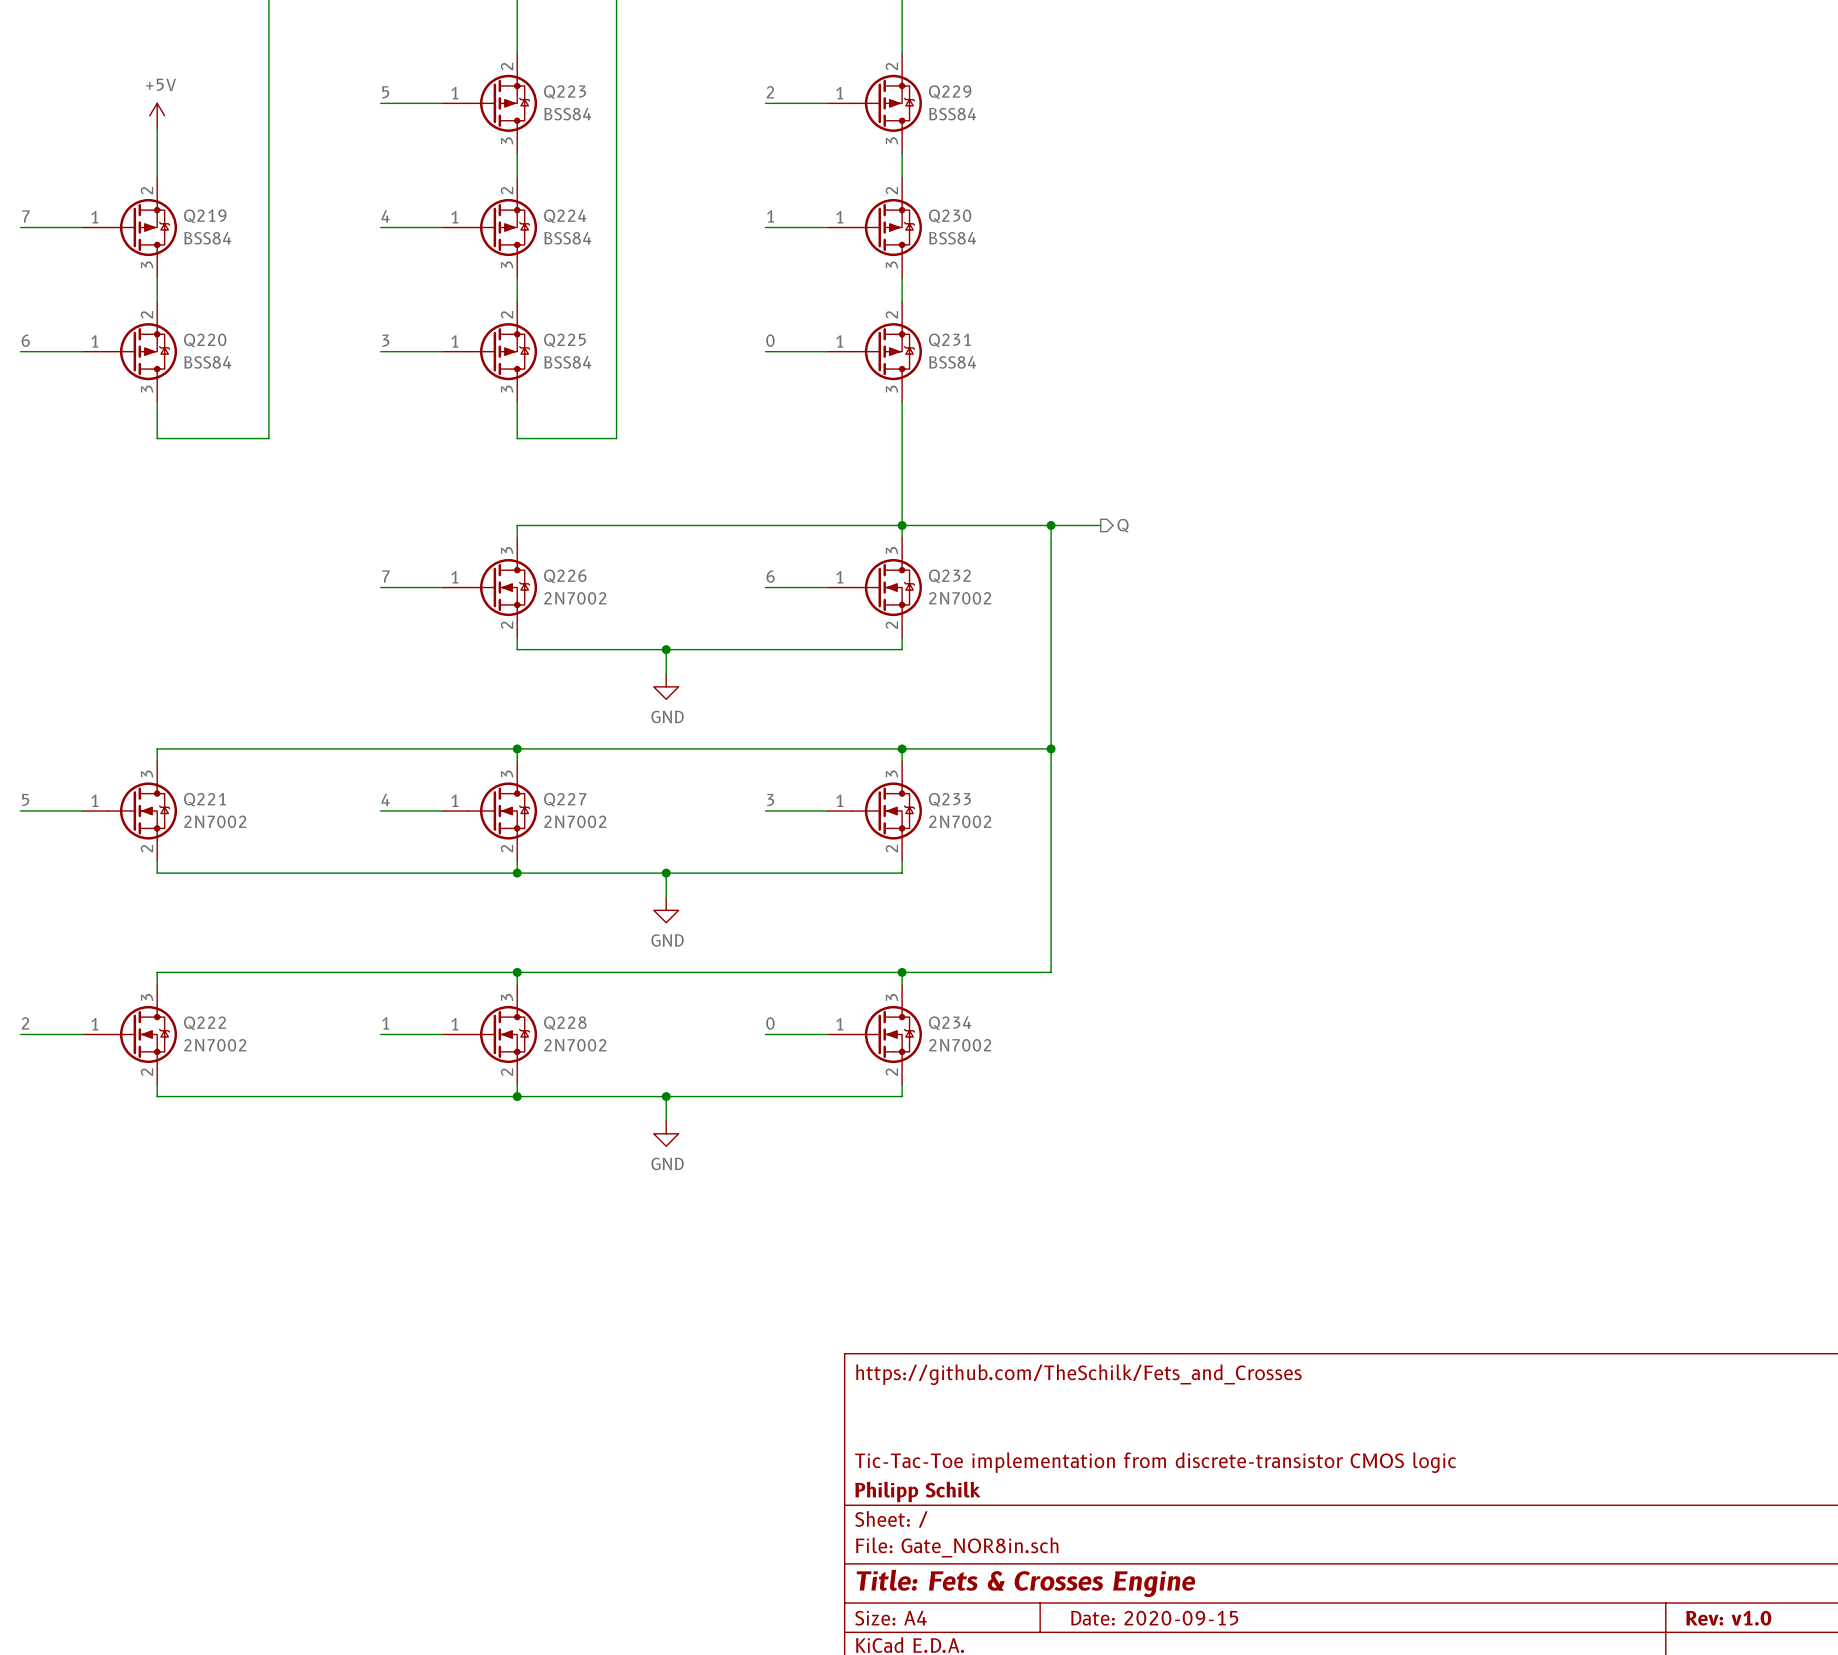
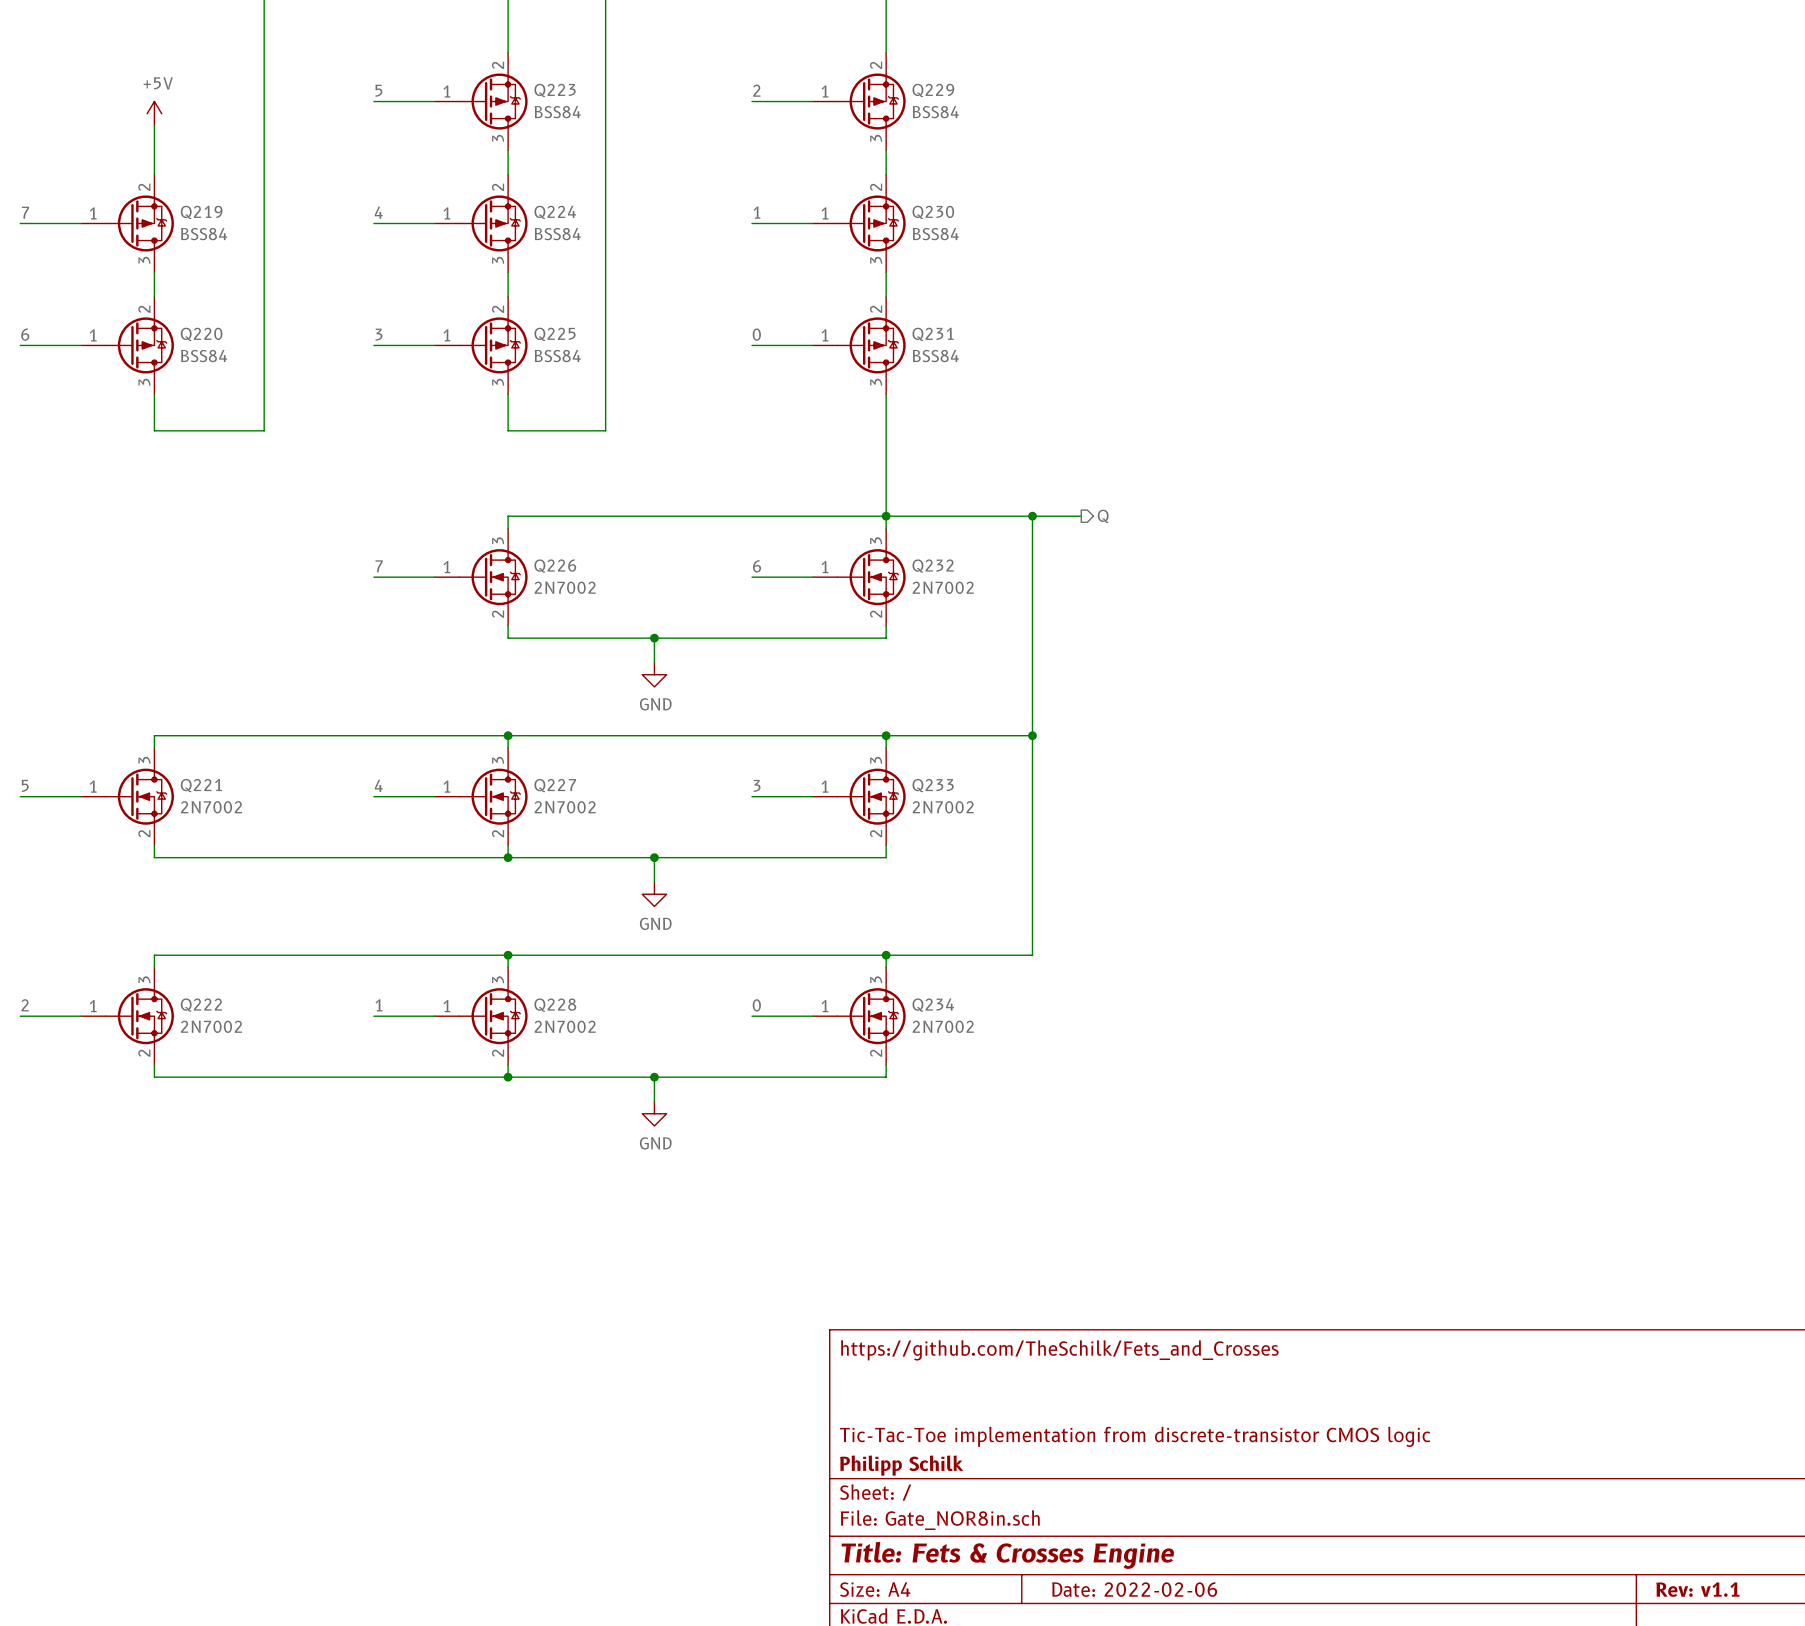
title block: Date: 2020-09-15 (1154, 1618) -> Date: 2022-02-06 (1134, 1589)
title block: Rev: v1.0 (1728, 1618) -> Rev: v1.1 (1697, 1589)

